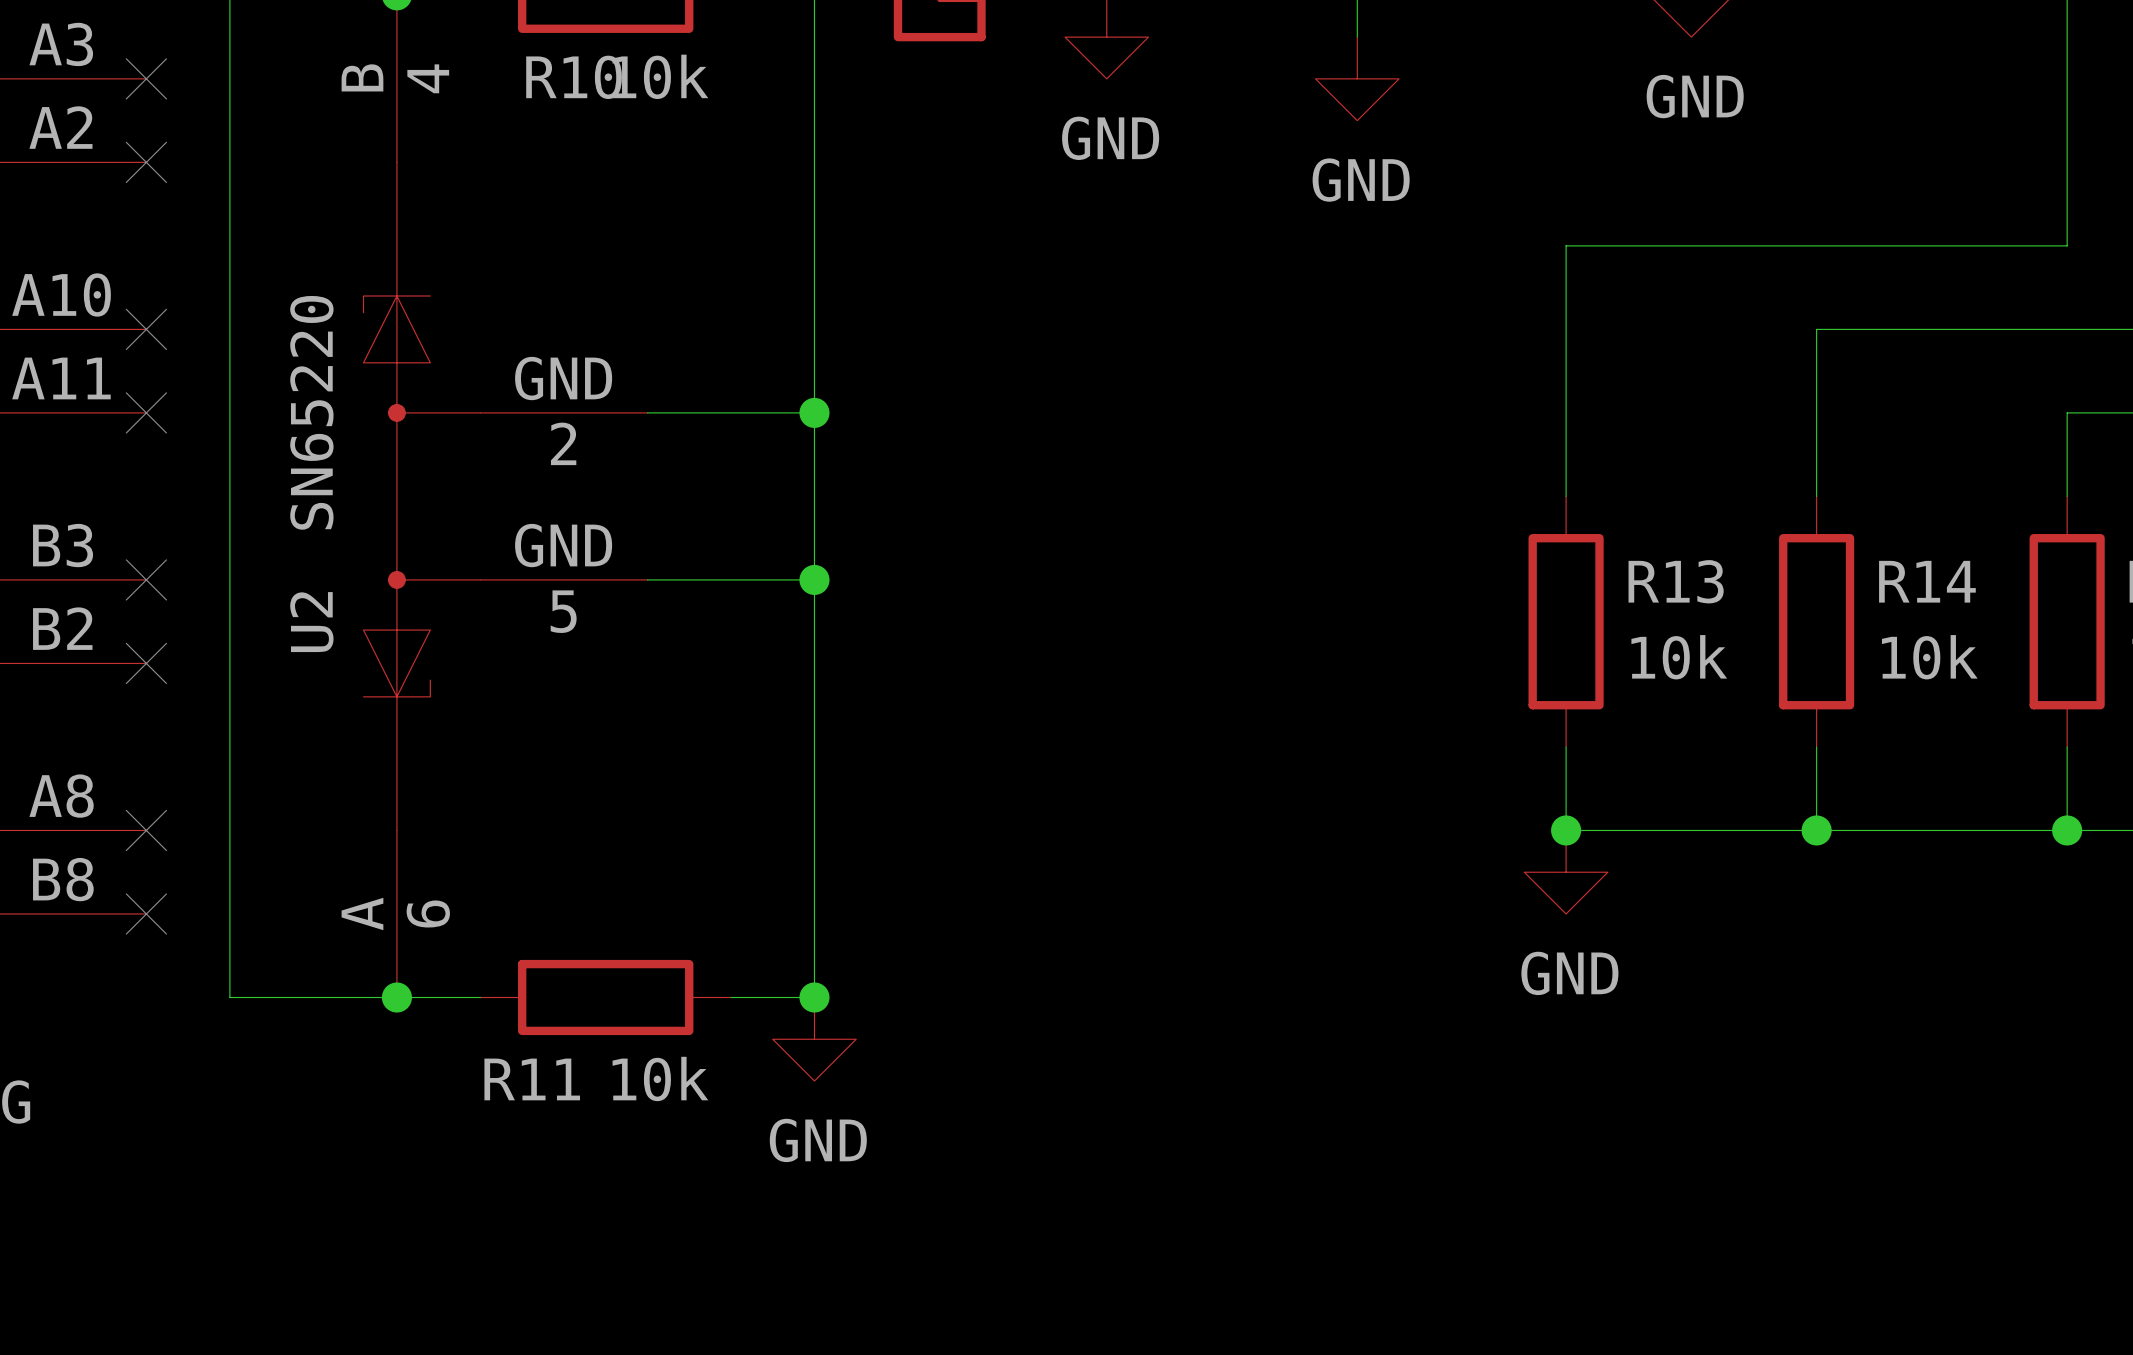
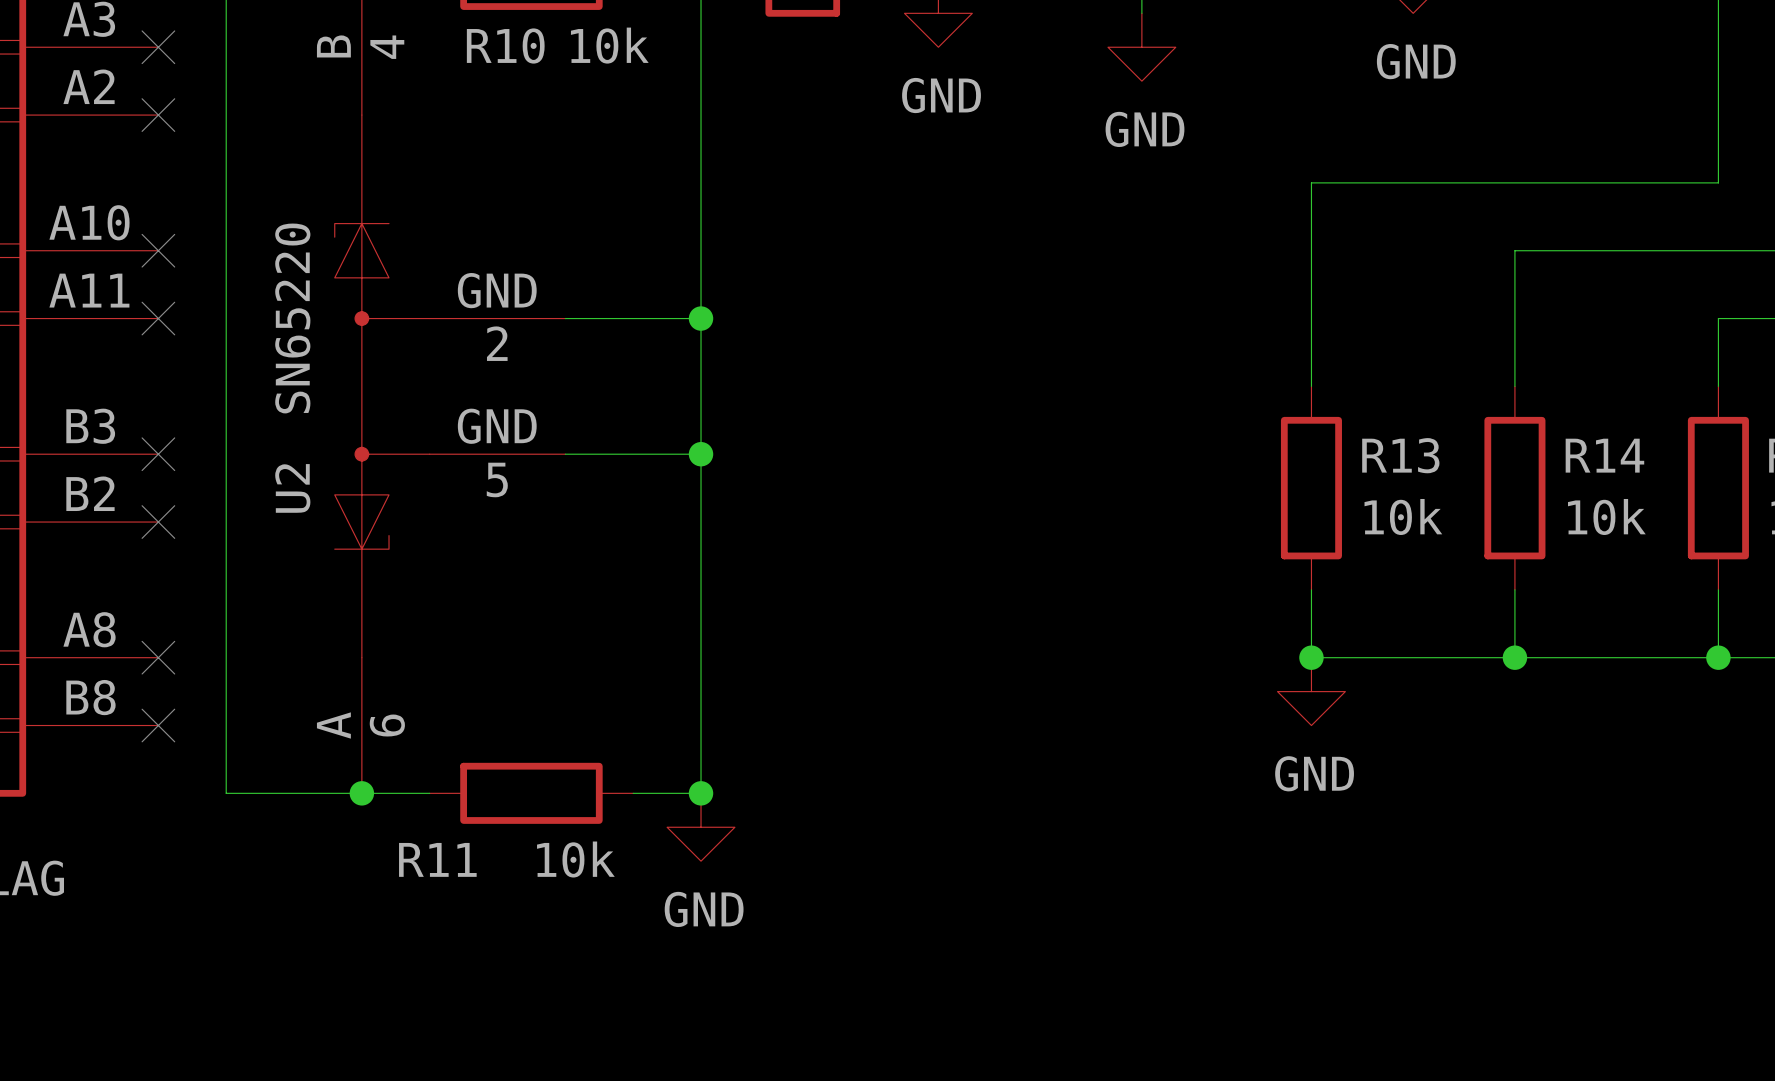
R10 value position: 10k (660, 76) -> 10k (609, 45)
R11 name position: R11 (532, 1079) -> R11 (437, 859)

